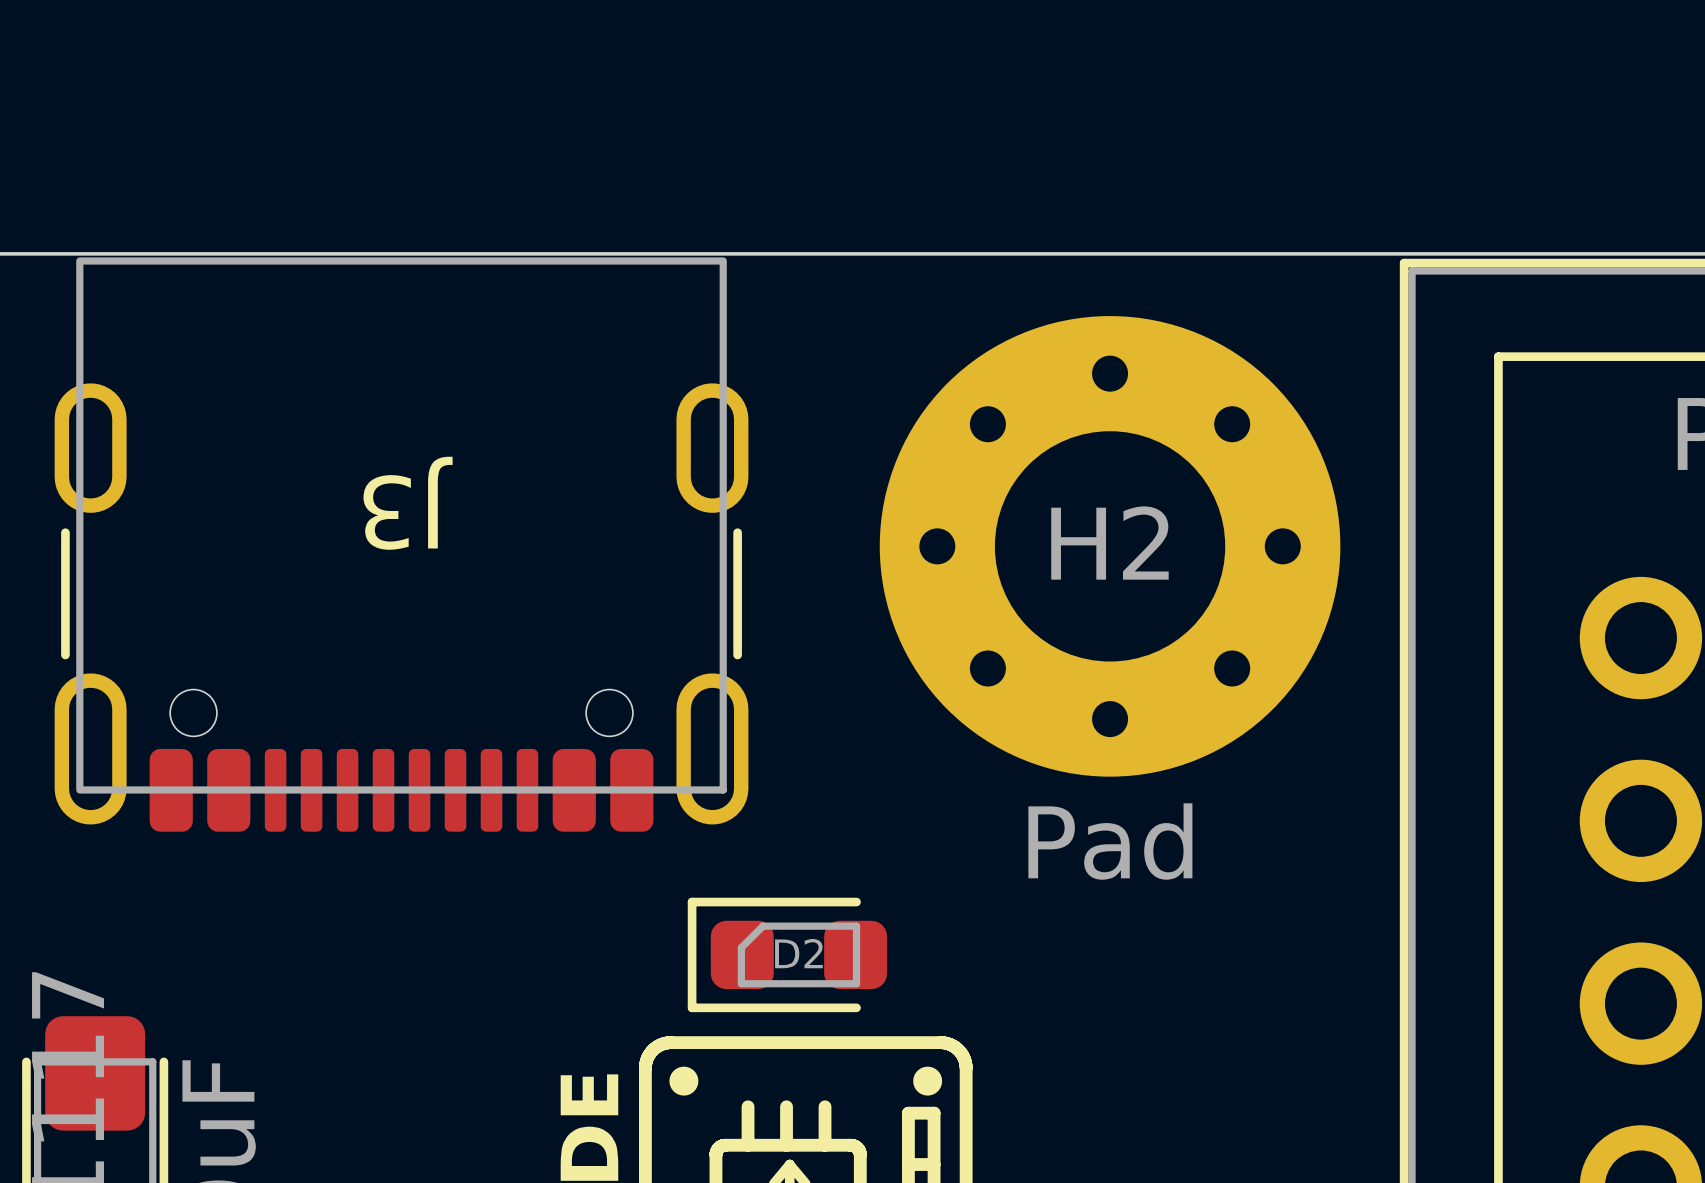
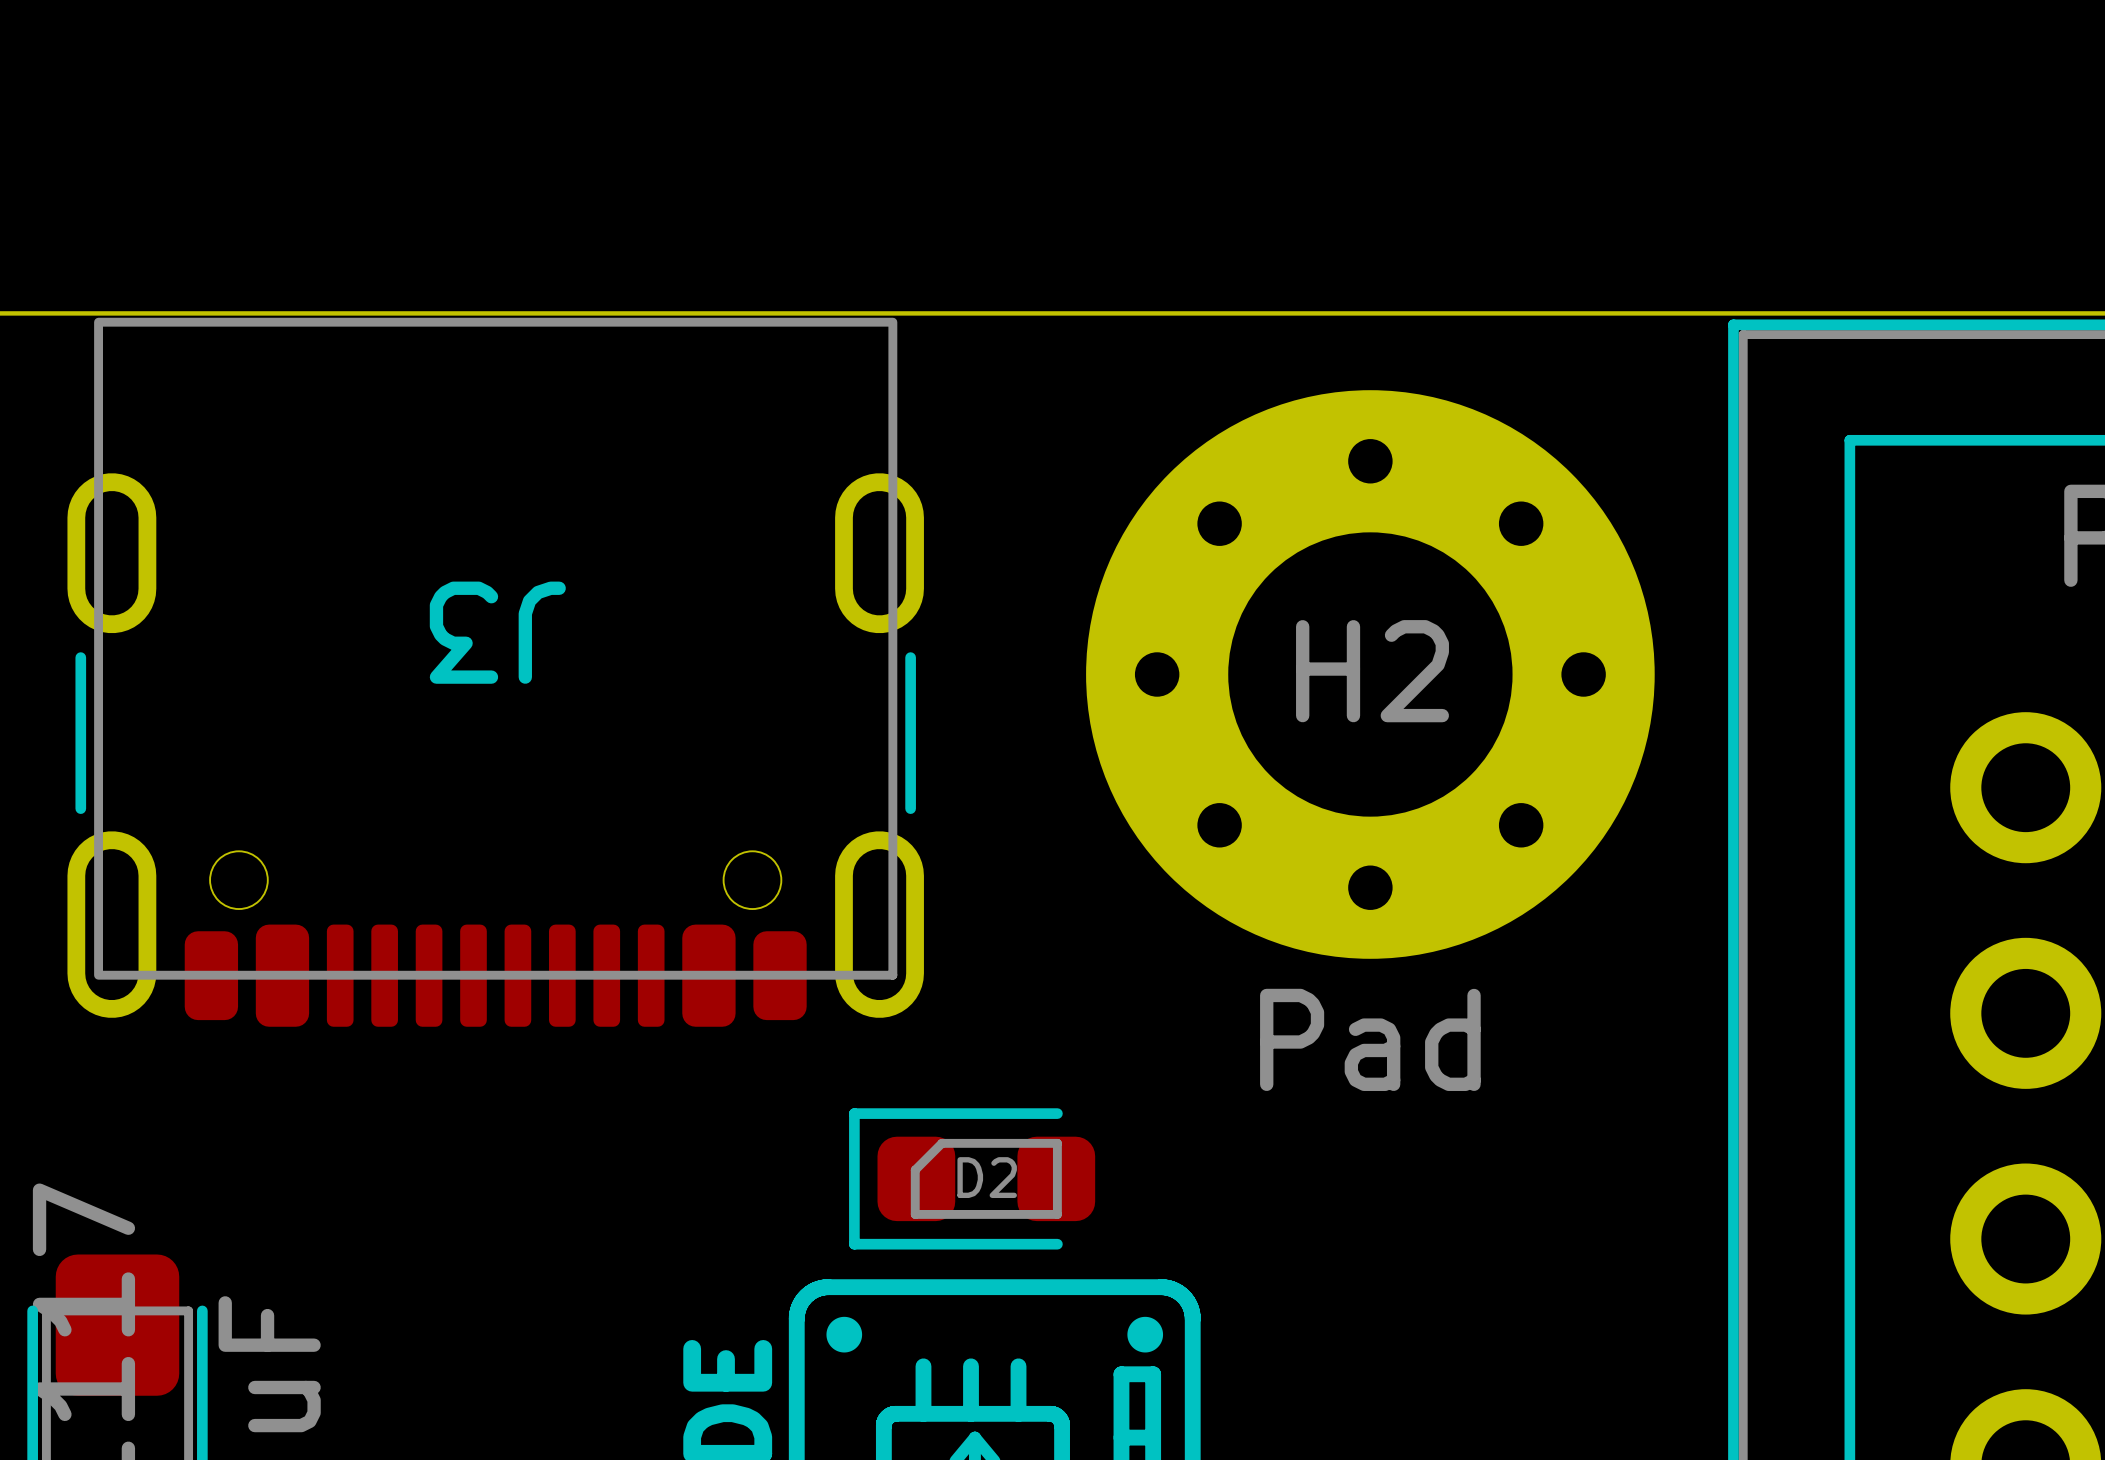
J3 footprint: [54, 257, 749, 832] -> [67, 317, 924, 1027]

